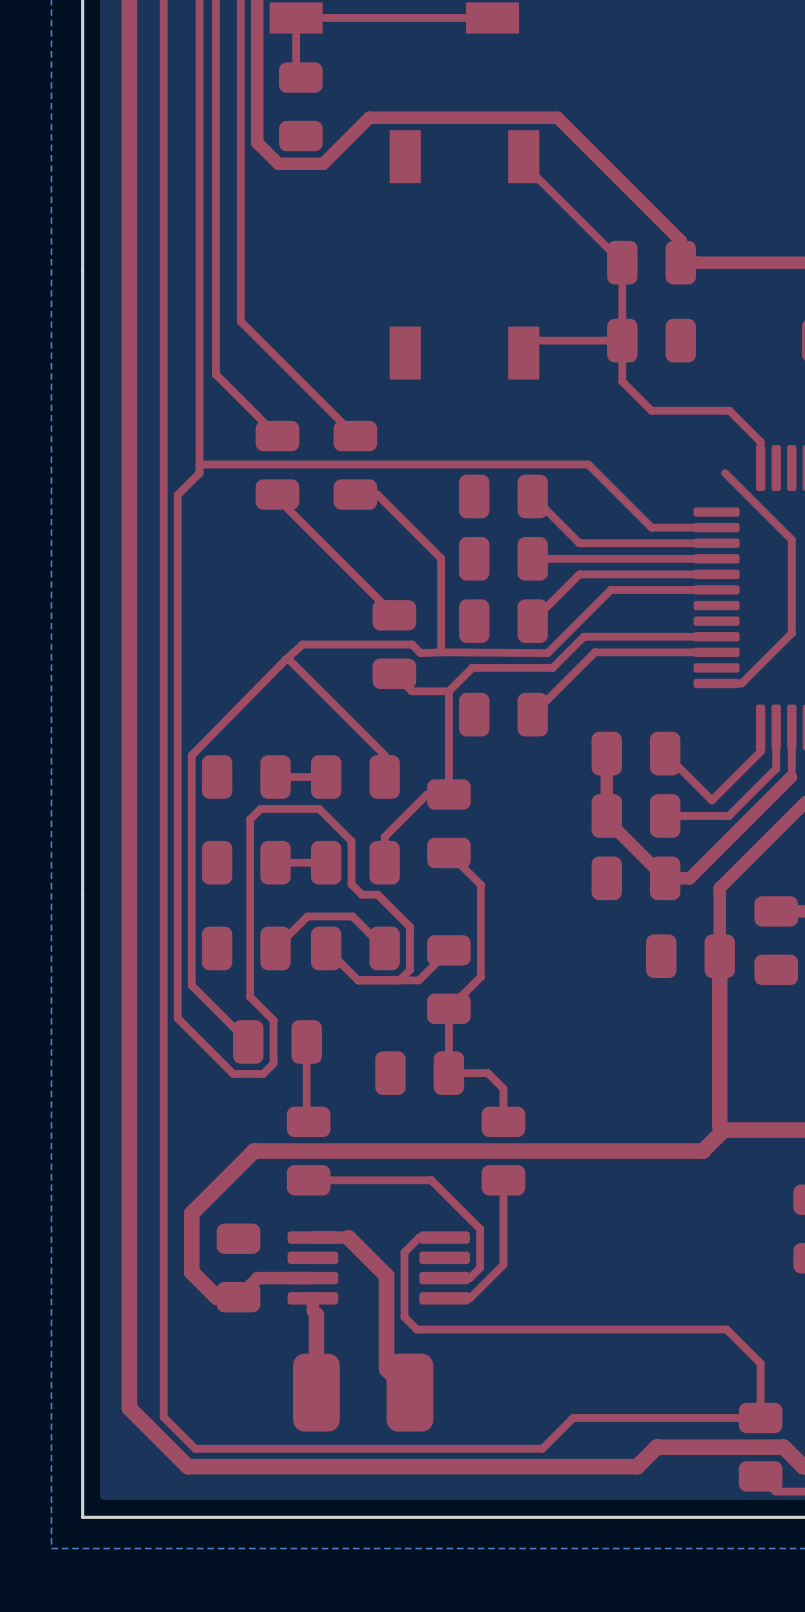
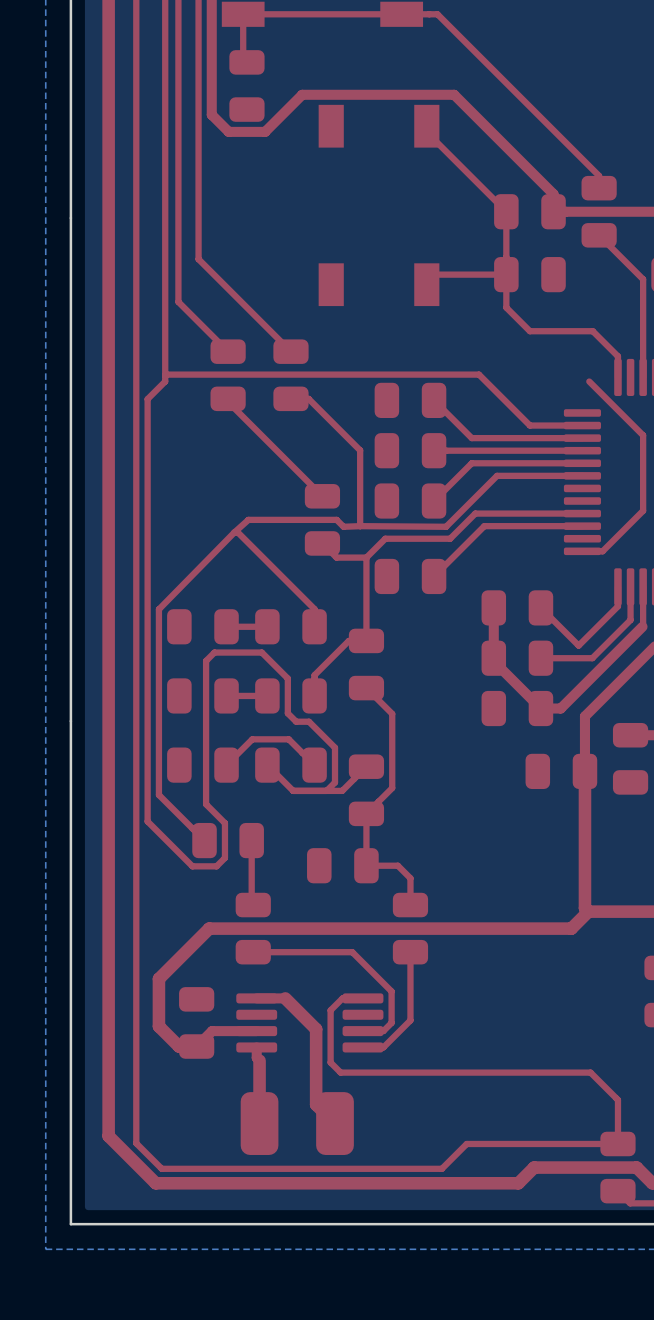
top track: none -> (401, 14) (437, 14) (599, 175) (599, 188)
part: none -> (599, 211)
top track: none -> (599, 235) (643, 279) (643, 377)

